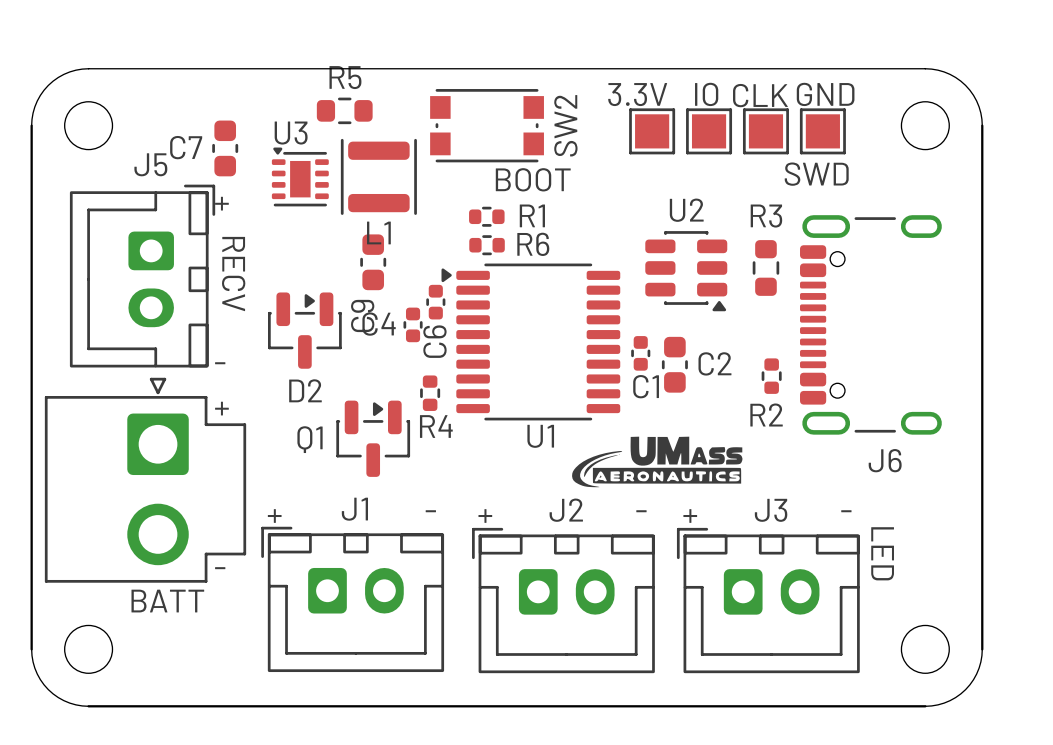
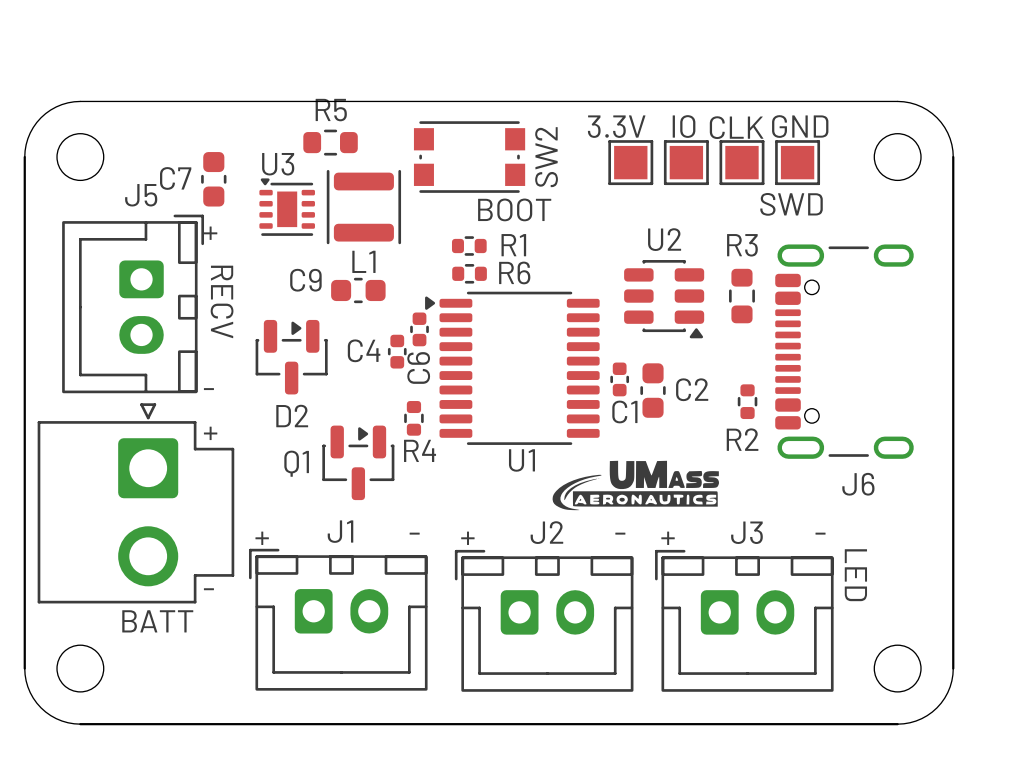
C9 rotation: 0° (373, 262) -> 90° clockwise (358, 290)

